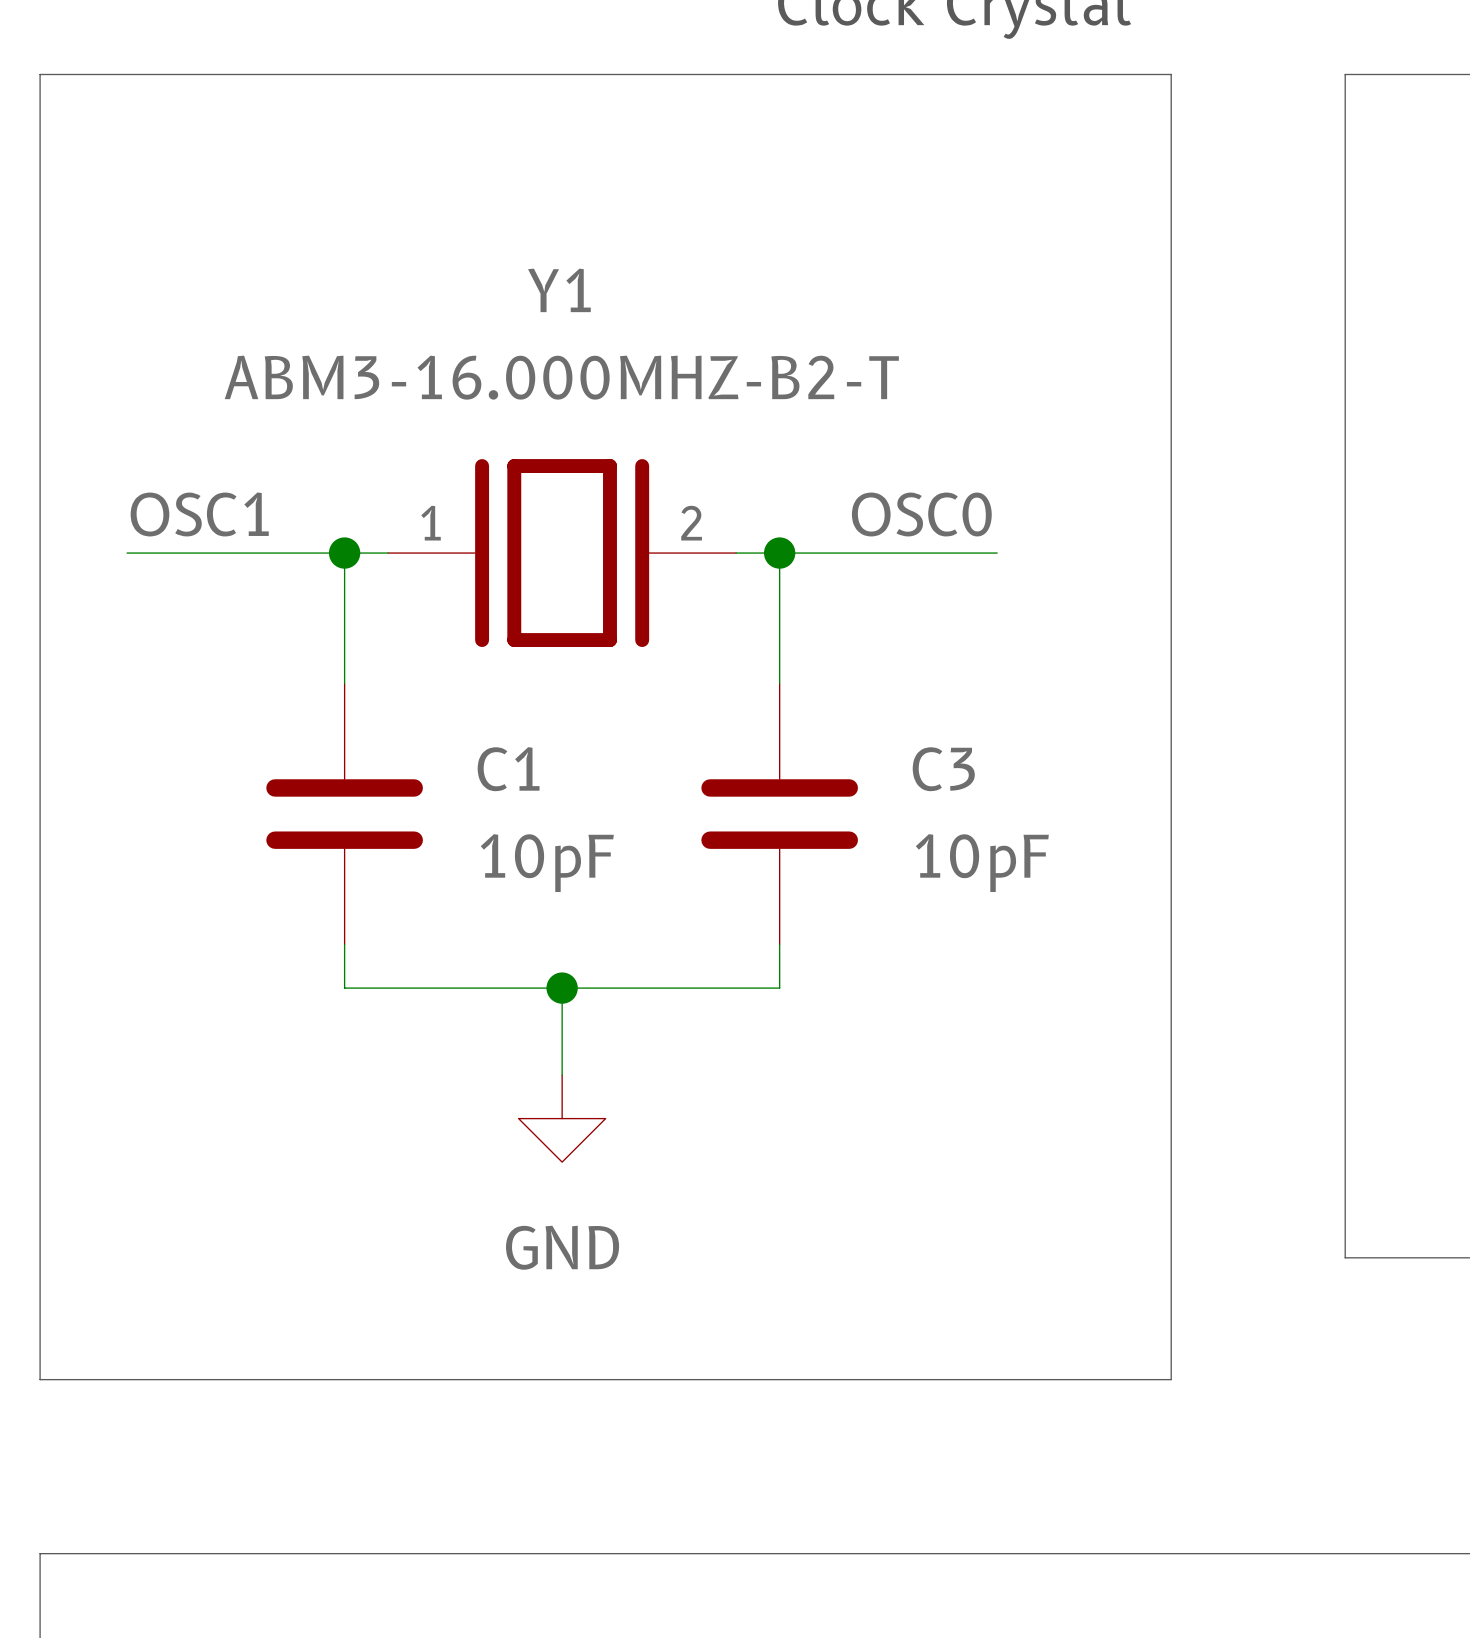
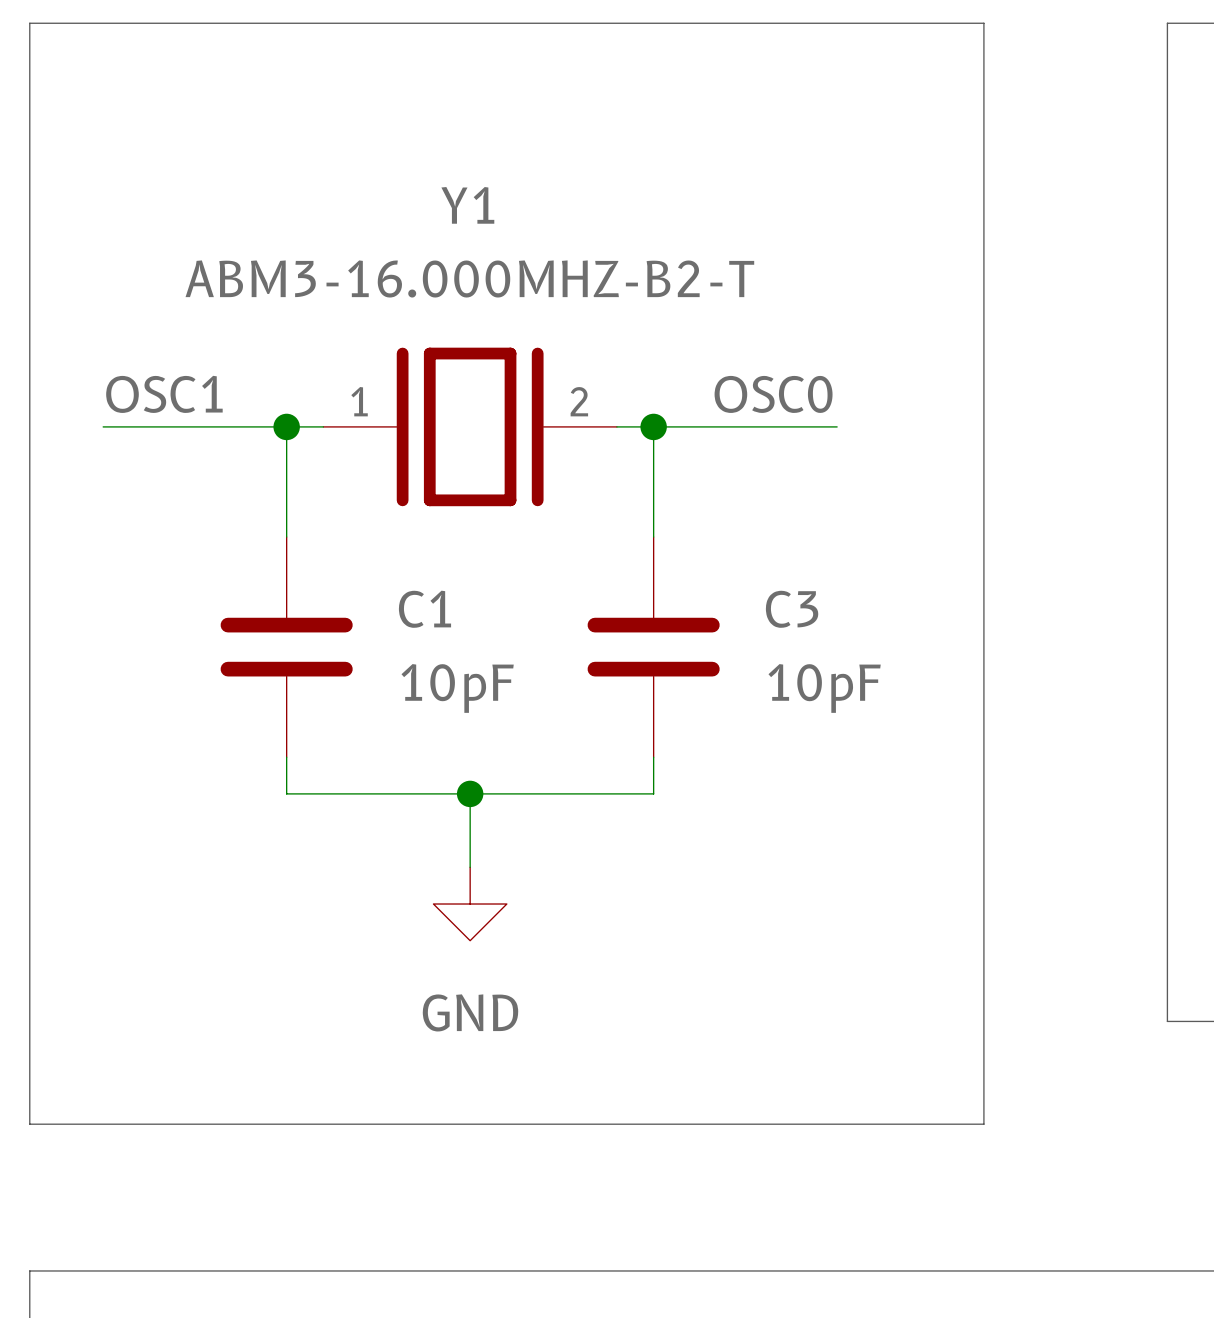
line: (1388, 74) (1345, 74) (1345, 1257) (1388, 1257) -> (1167, 23) (1167, 1021)

